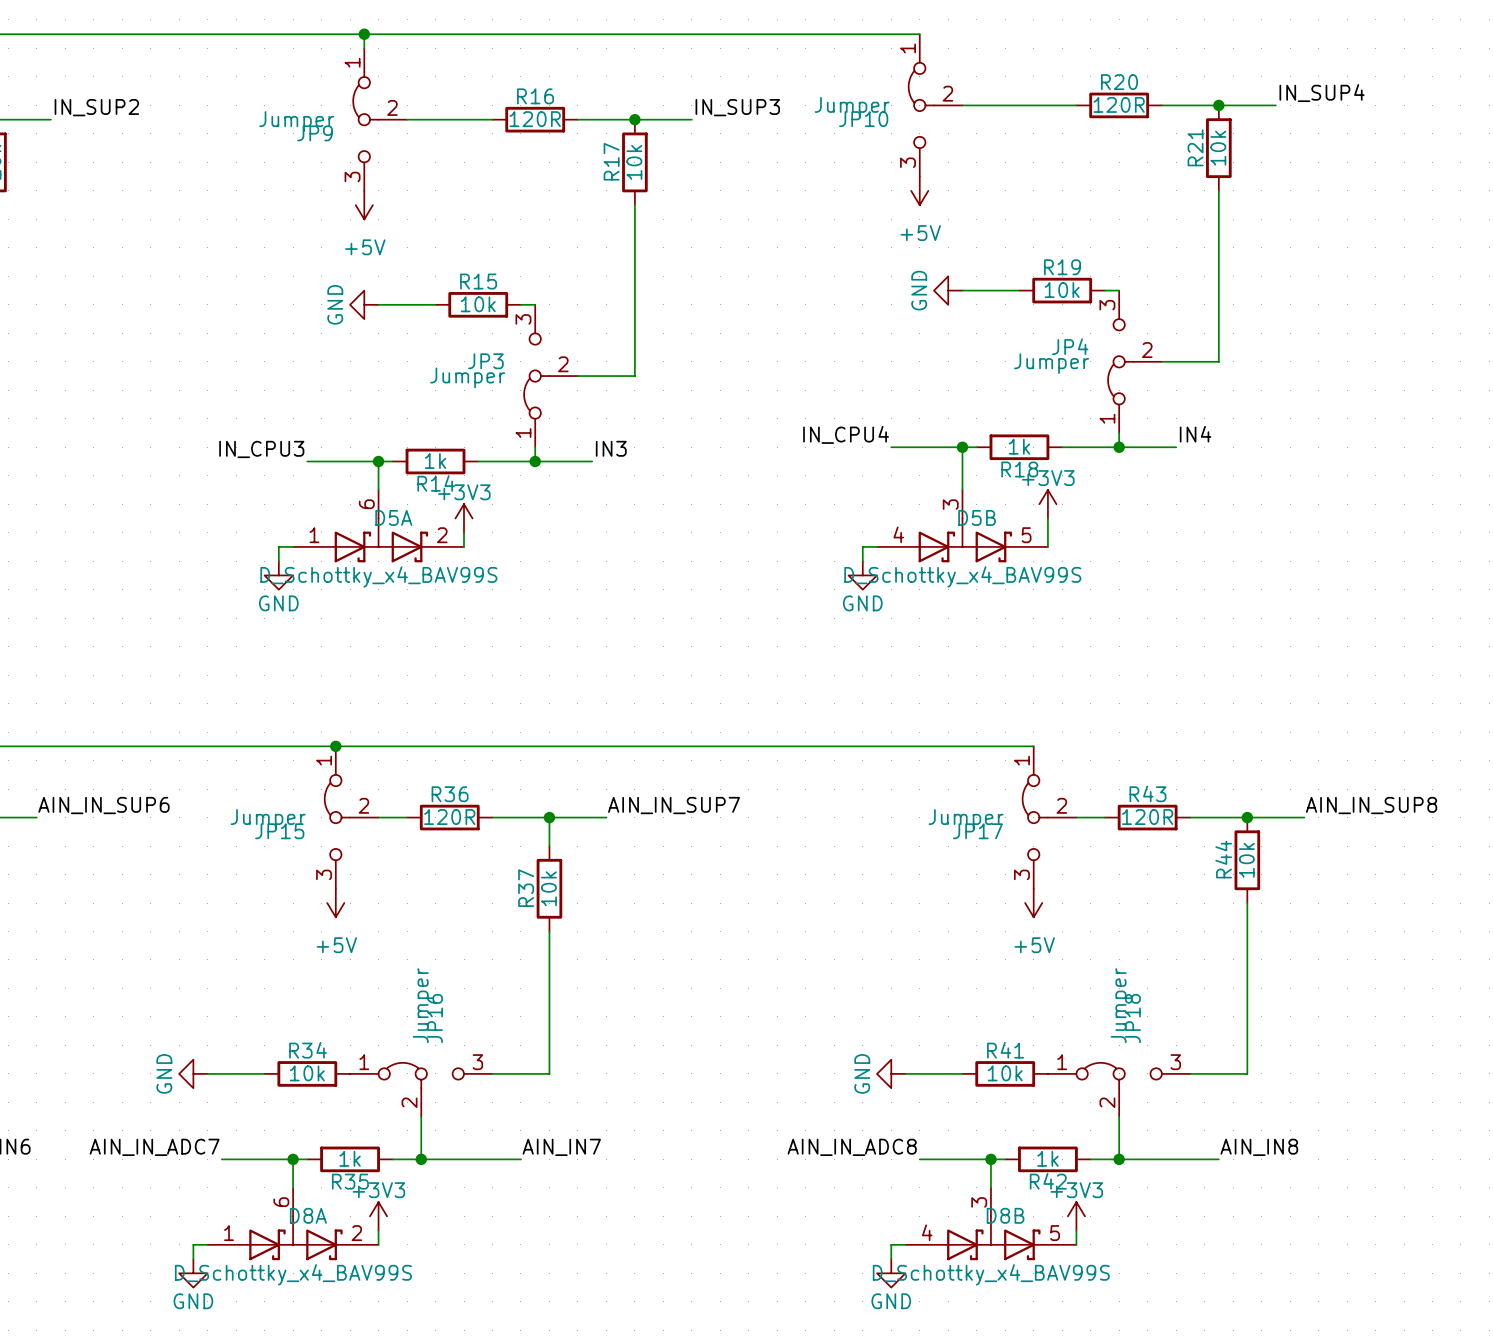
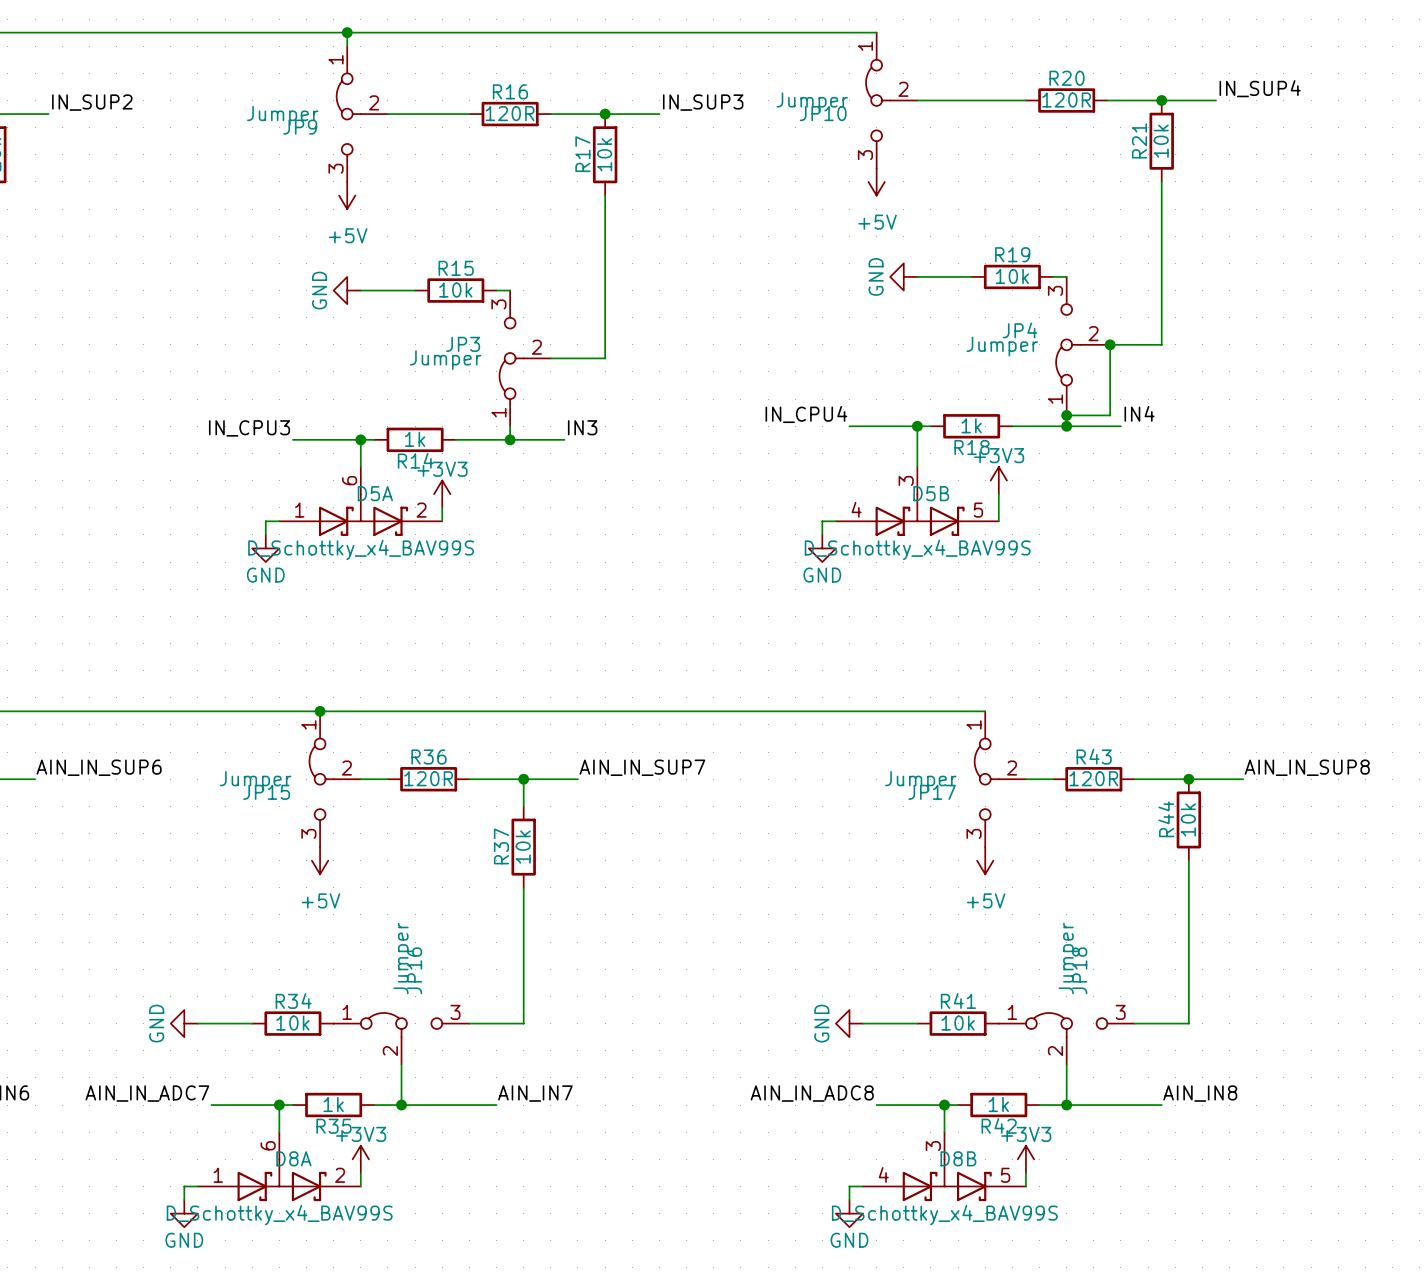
wire: none -> (1110, 344) (1110, 415) (1066, 415)
junction: none -> (1110, 344)
junction: none -> (1066, 415)

